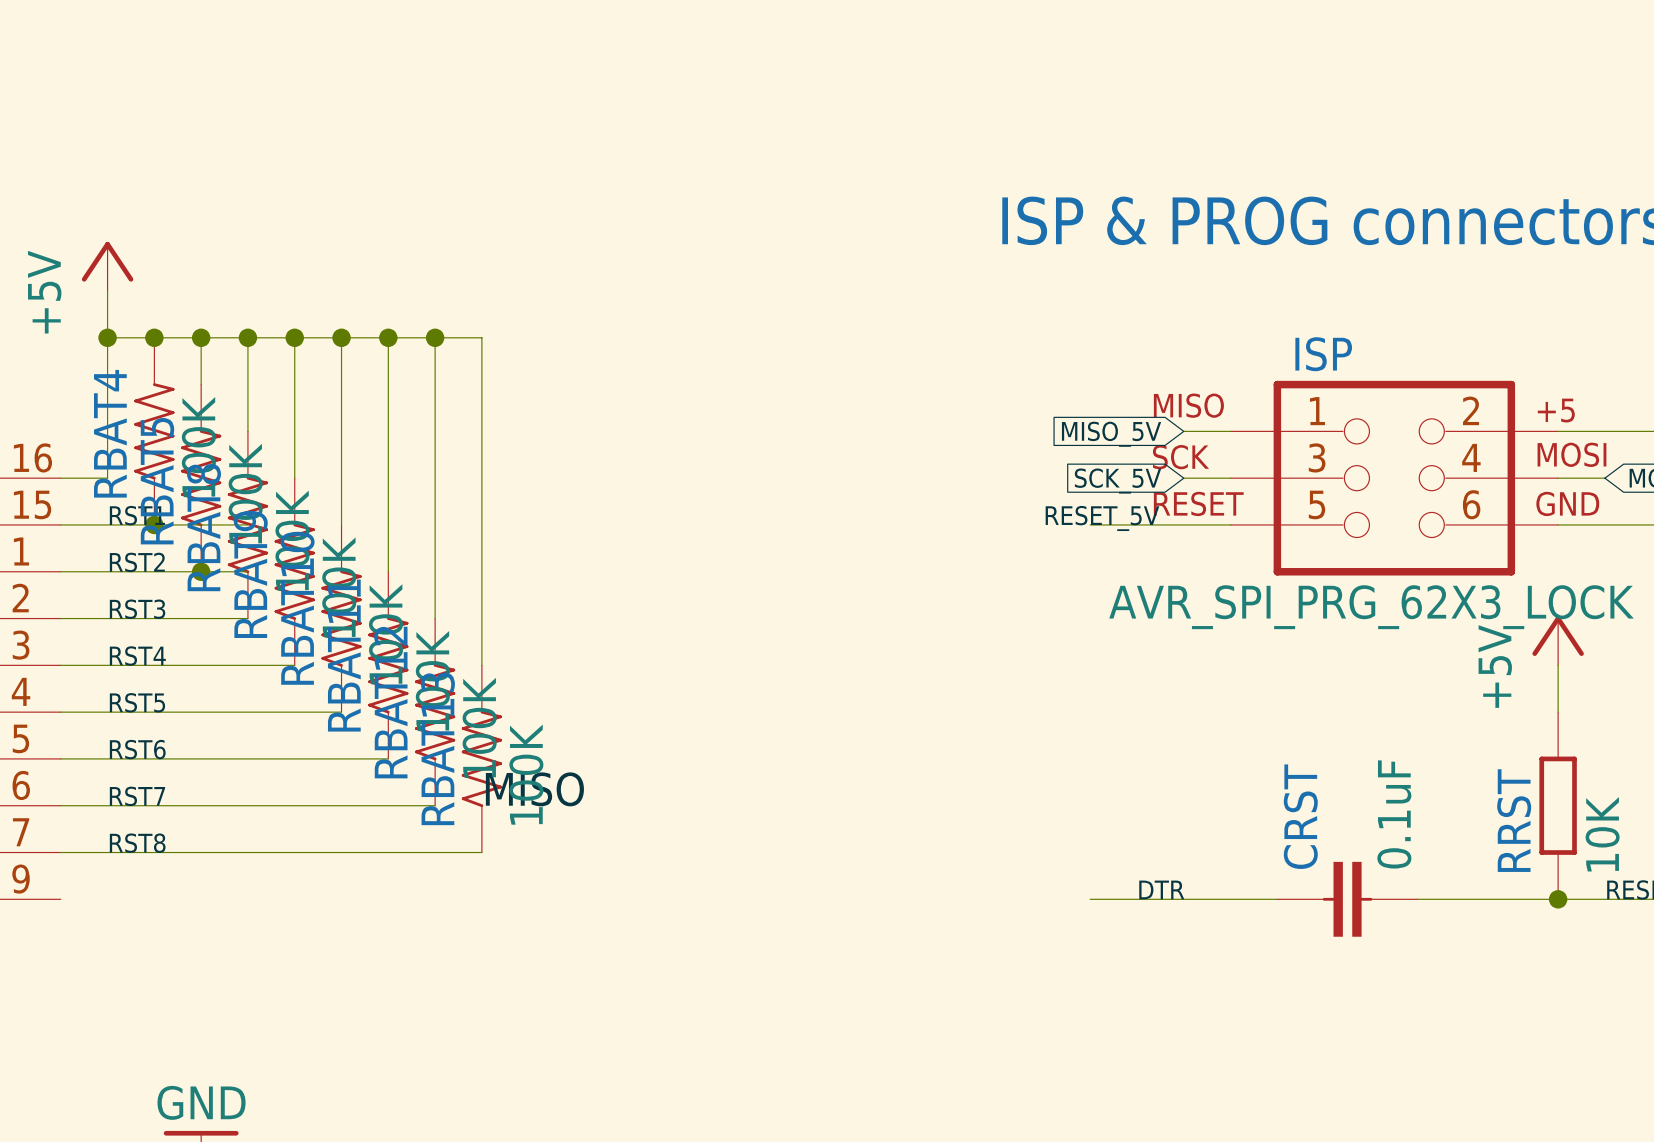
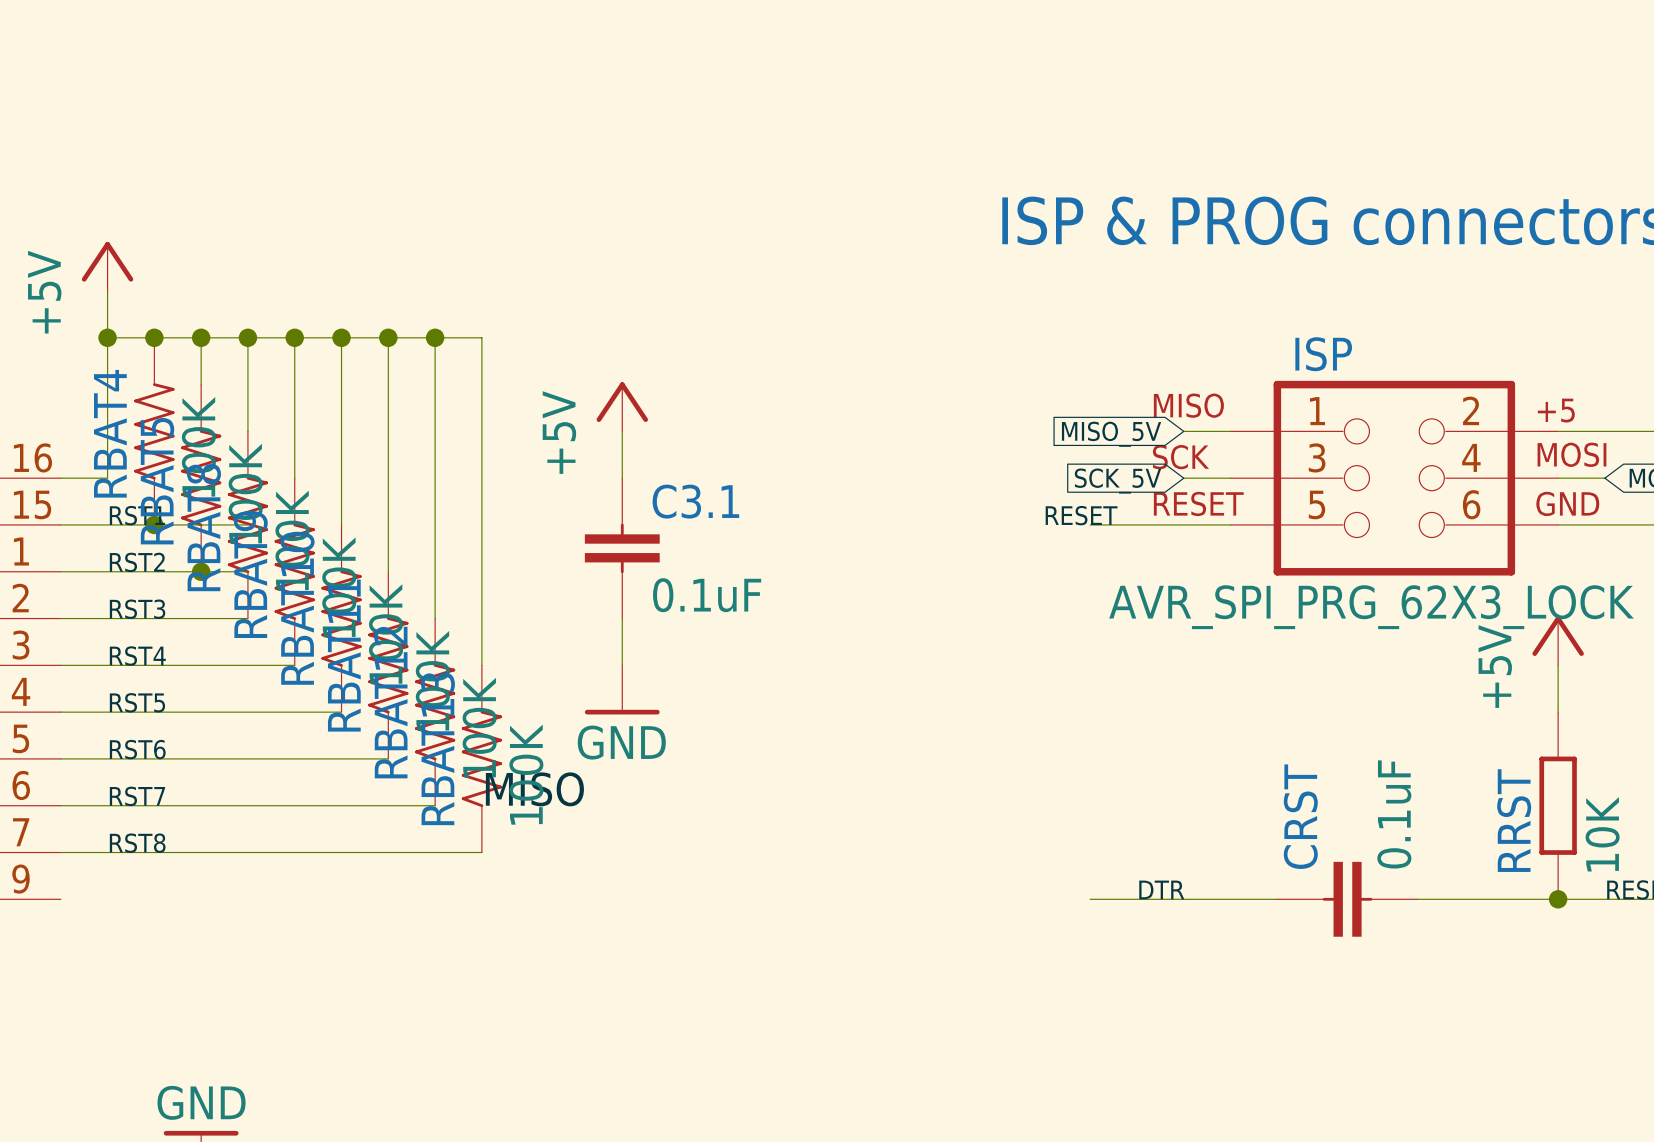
power symbol: none -> +5V (622, 406)
wire: none -> (622, 431) (622, 478)
label: RESET_5V (1102, 518) -> RESET (1081, 515)
C3.1: none -> 0.1uF (622, 548)
wire: none -> (622, 618) (622, 665)
power symbol: none -> GND (622, 689)

